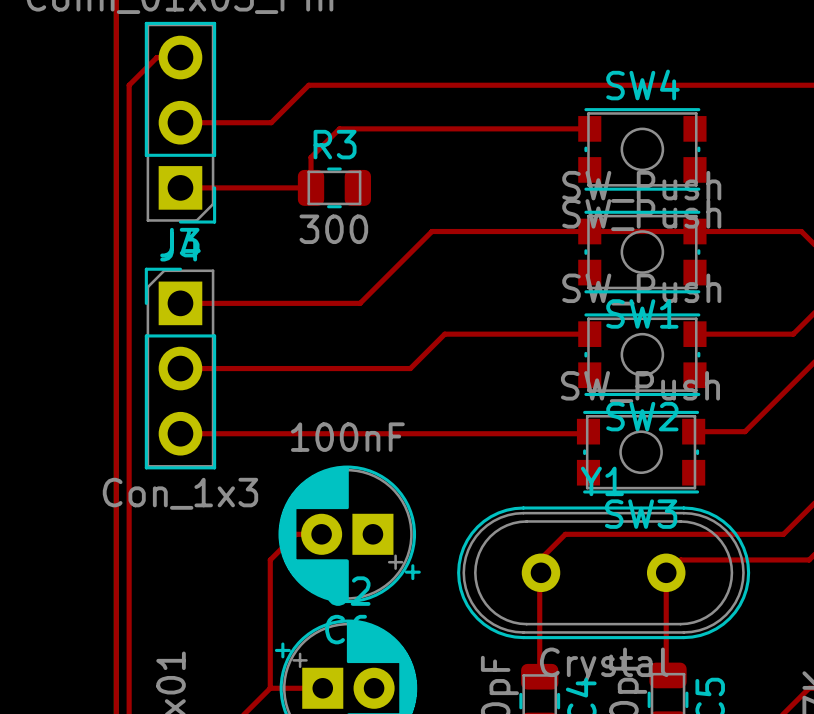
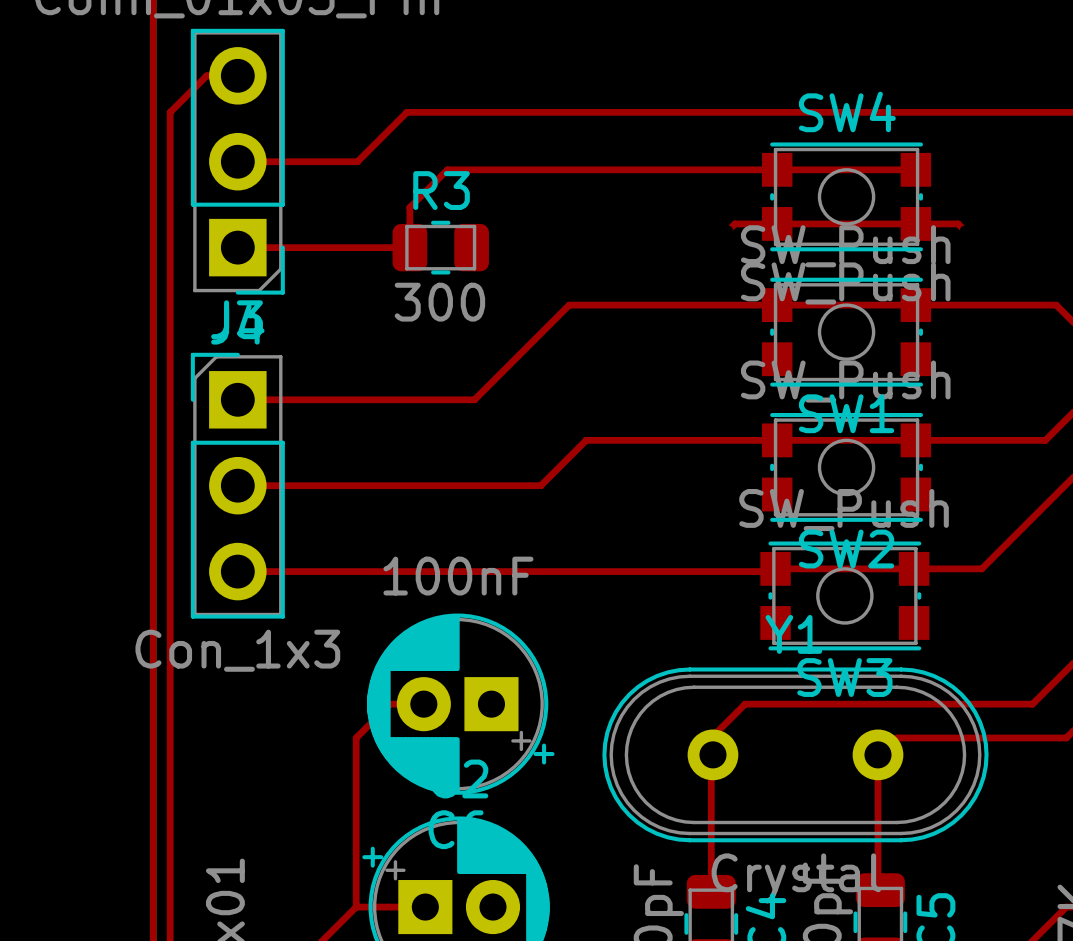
top track: none -> (777, 169) (915, 169)
top track: none -> (728, 230) (734, 223) (958, 223) (964, 230)
via: none -> (728, 230)
via: none -> (964, 230)
top track: none -> (777, 440) (915, 440)
top track: none -> (775, 568) (914, 568)

